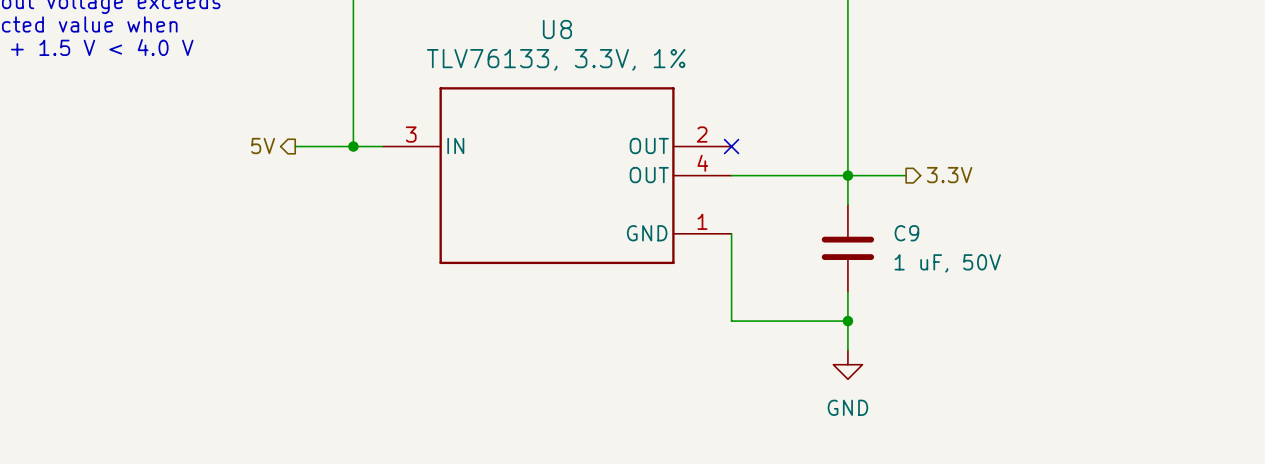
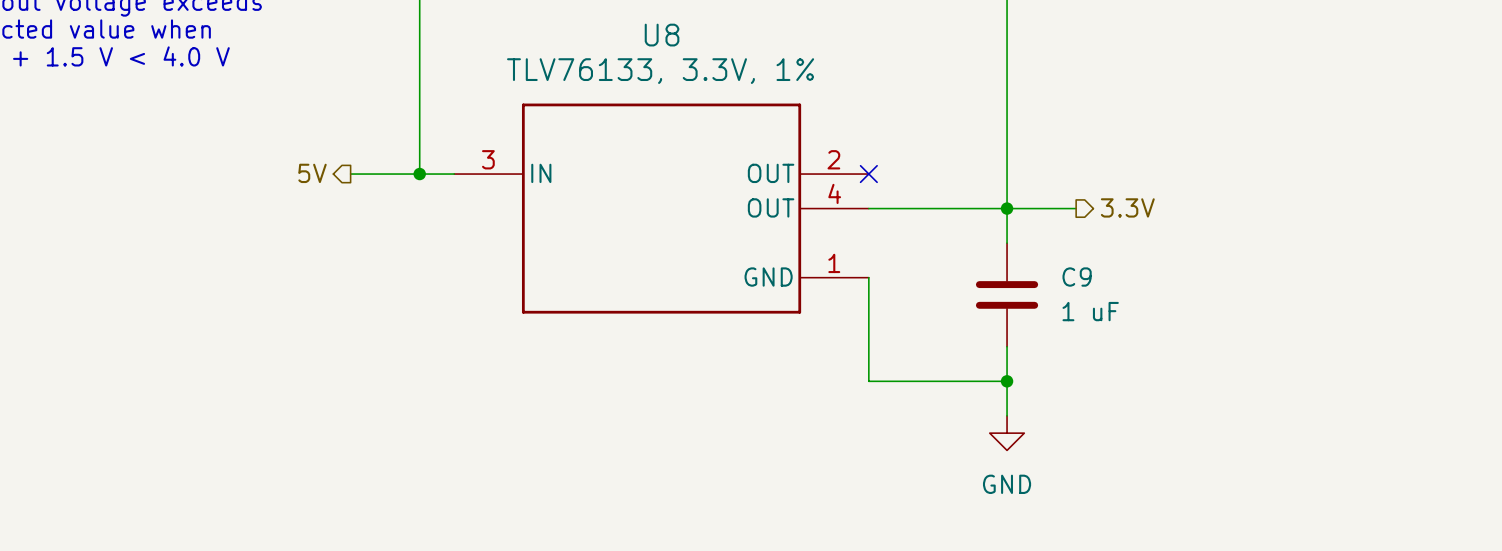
C9 value: 1 uF, 50V (947, 263) -> 1 uF (1090, 311)

